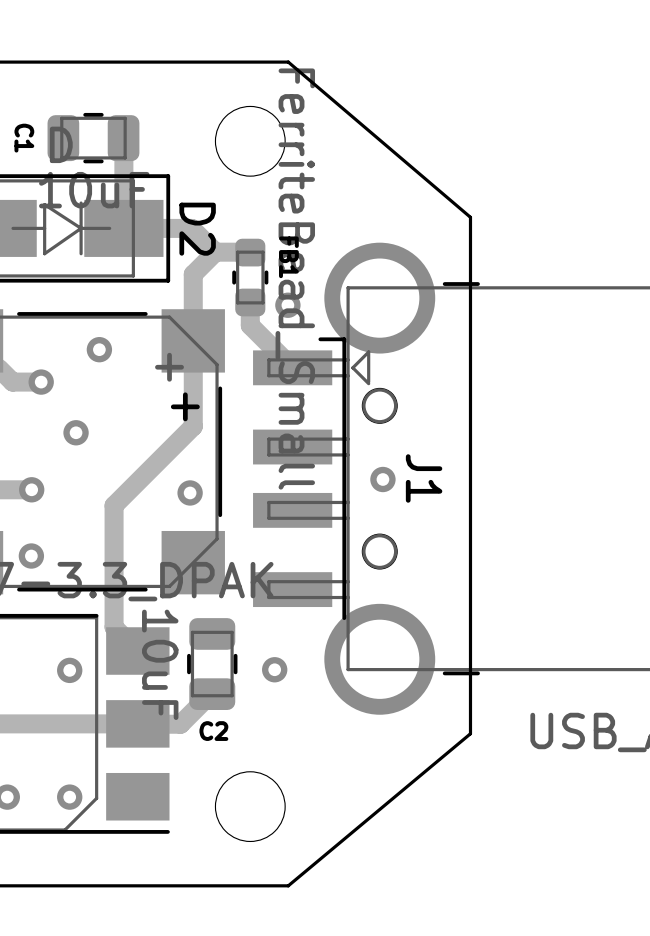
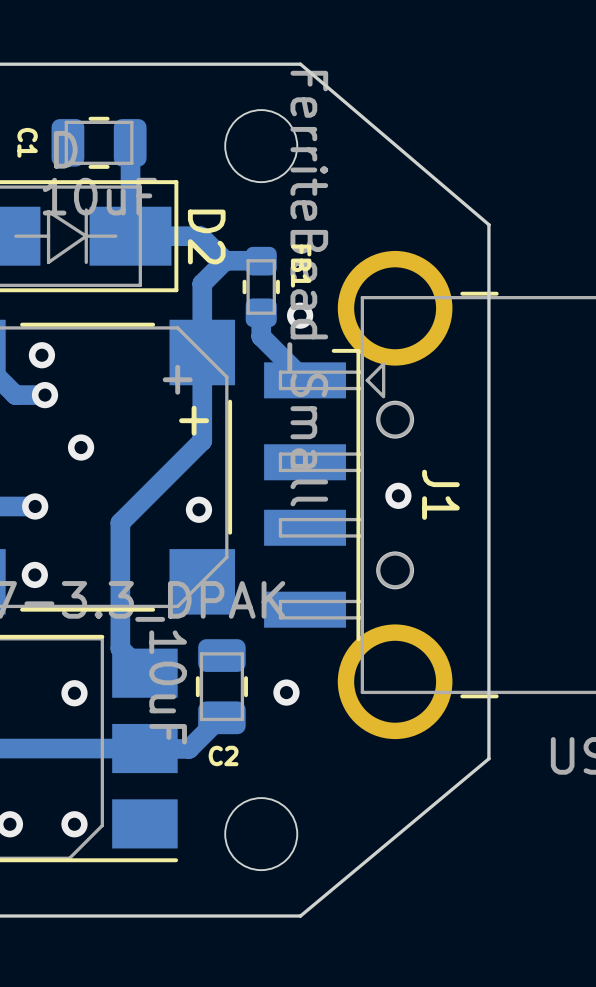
via: none -> (41, 355)
via: (99, 349) -> none

